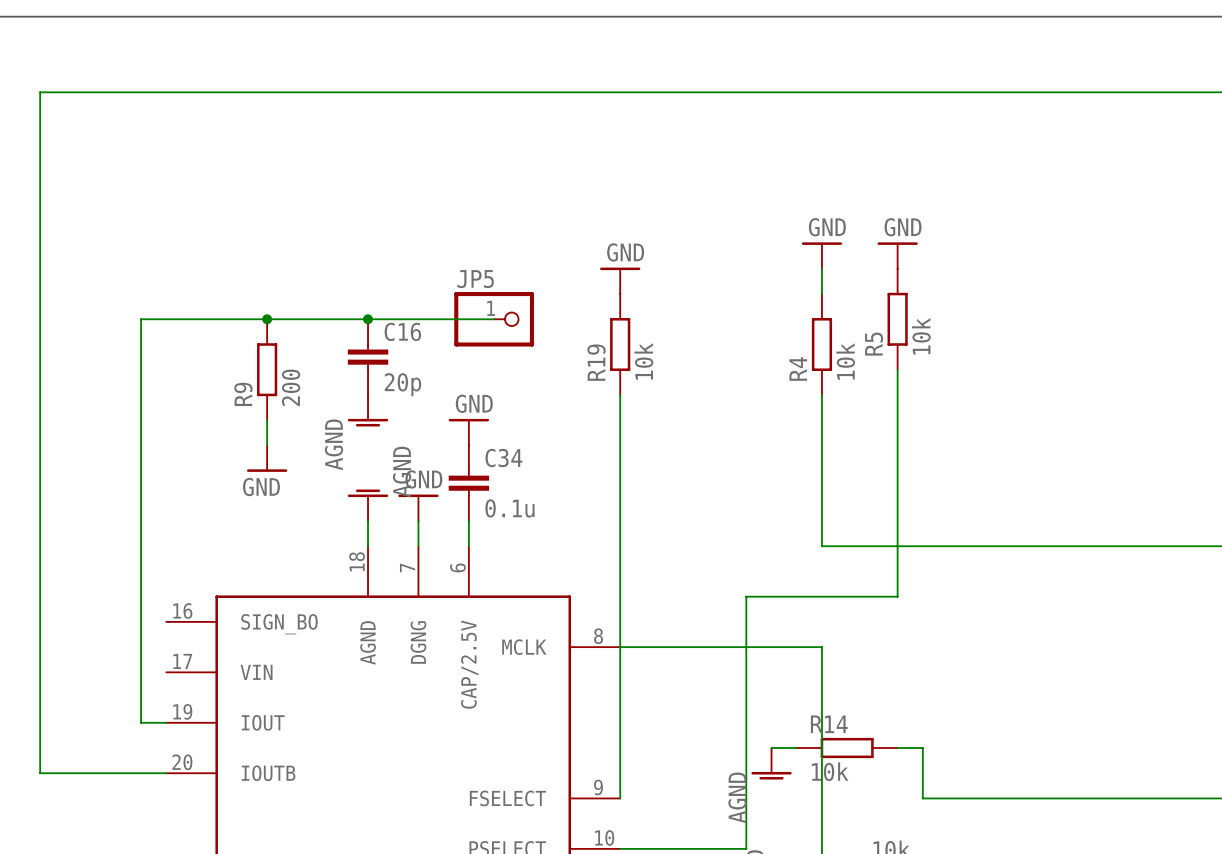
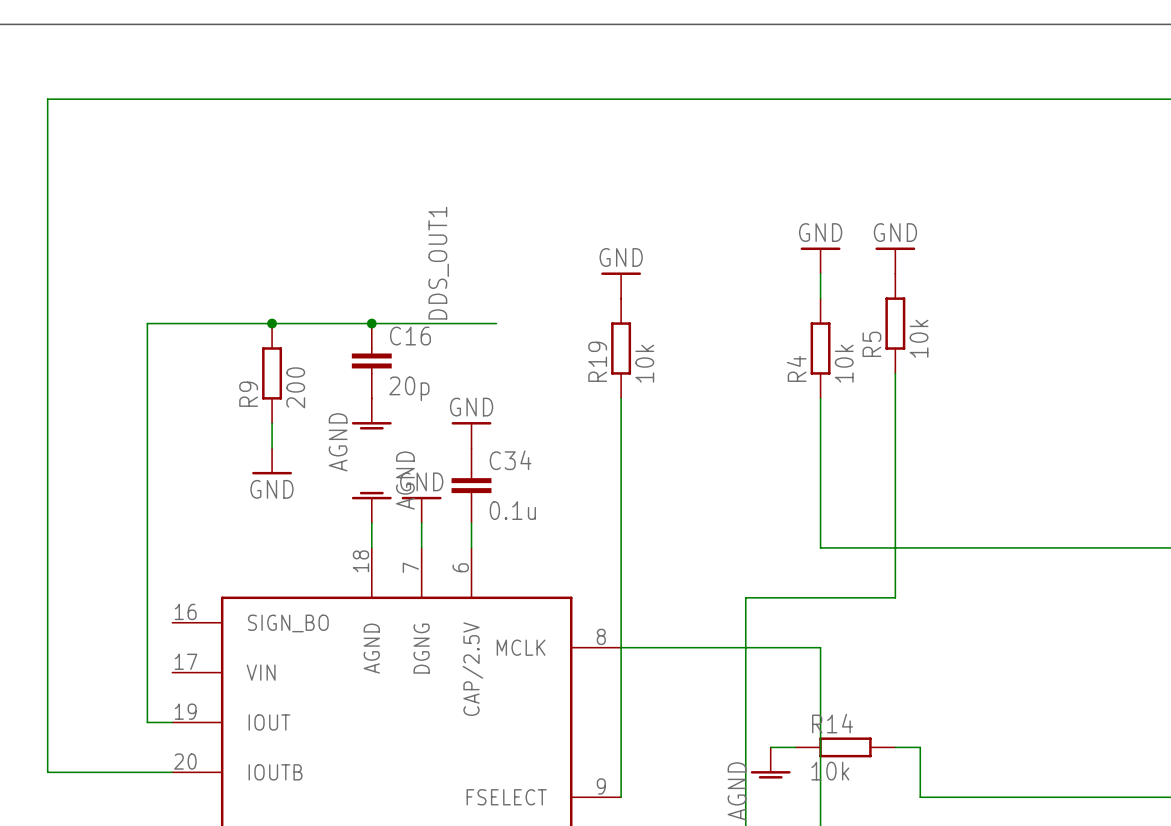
label: none -> DDS_OUT1 (438, 263)
JP5: (494, 319) -> none

